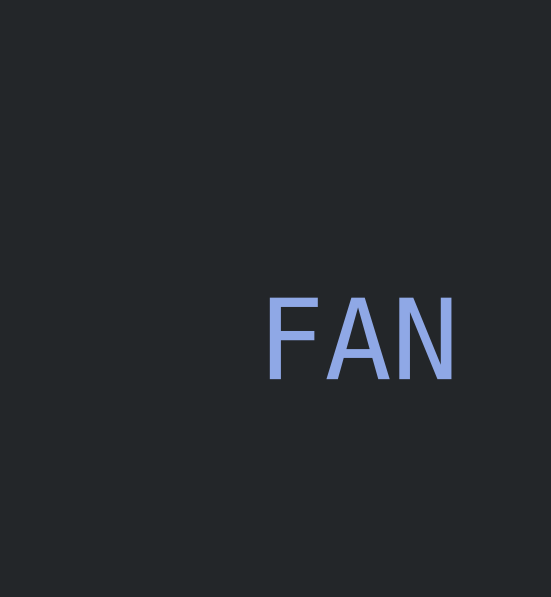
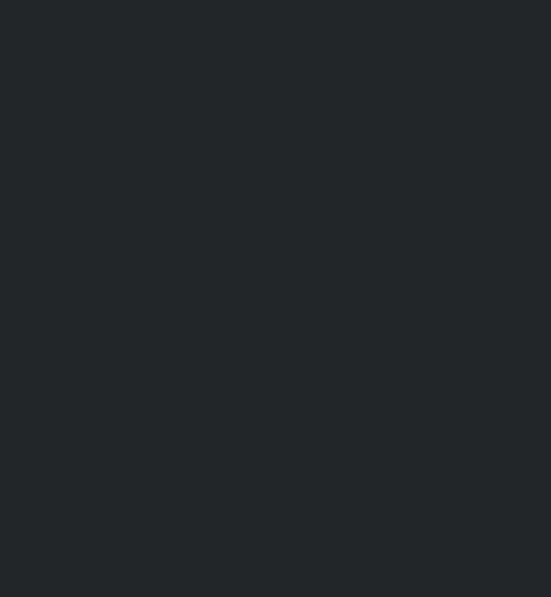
text: FAN (360, 338) -> none

